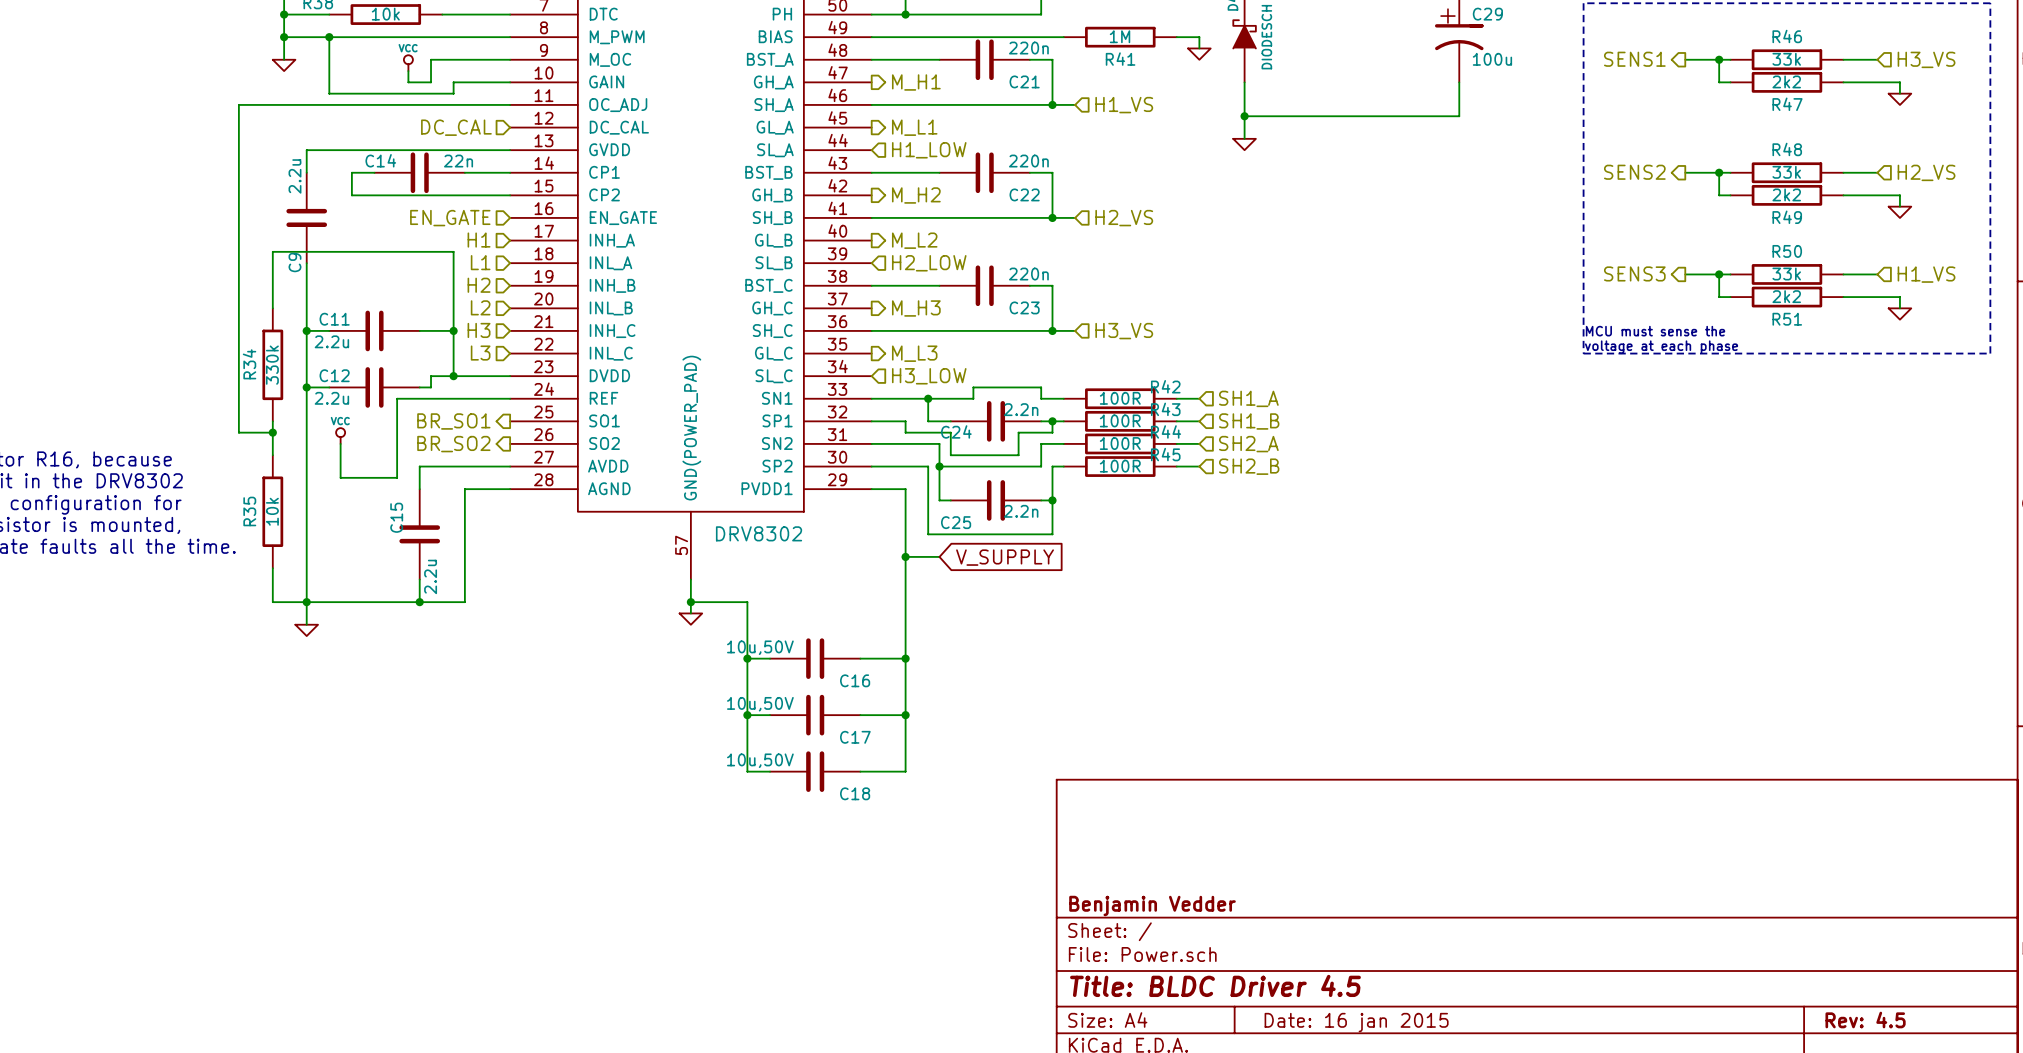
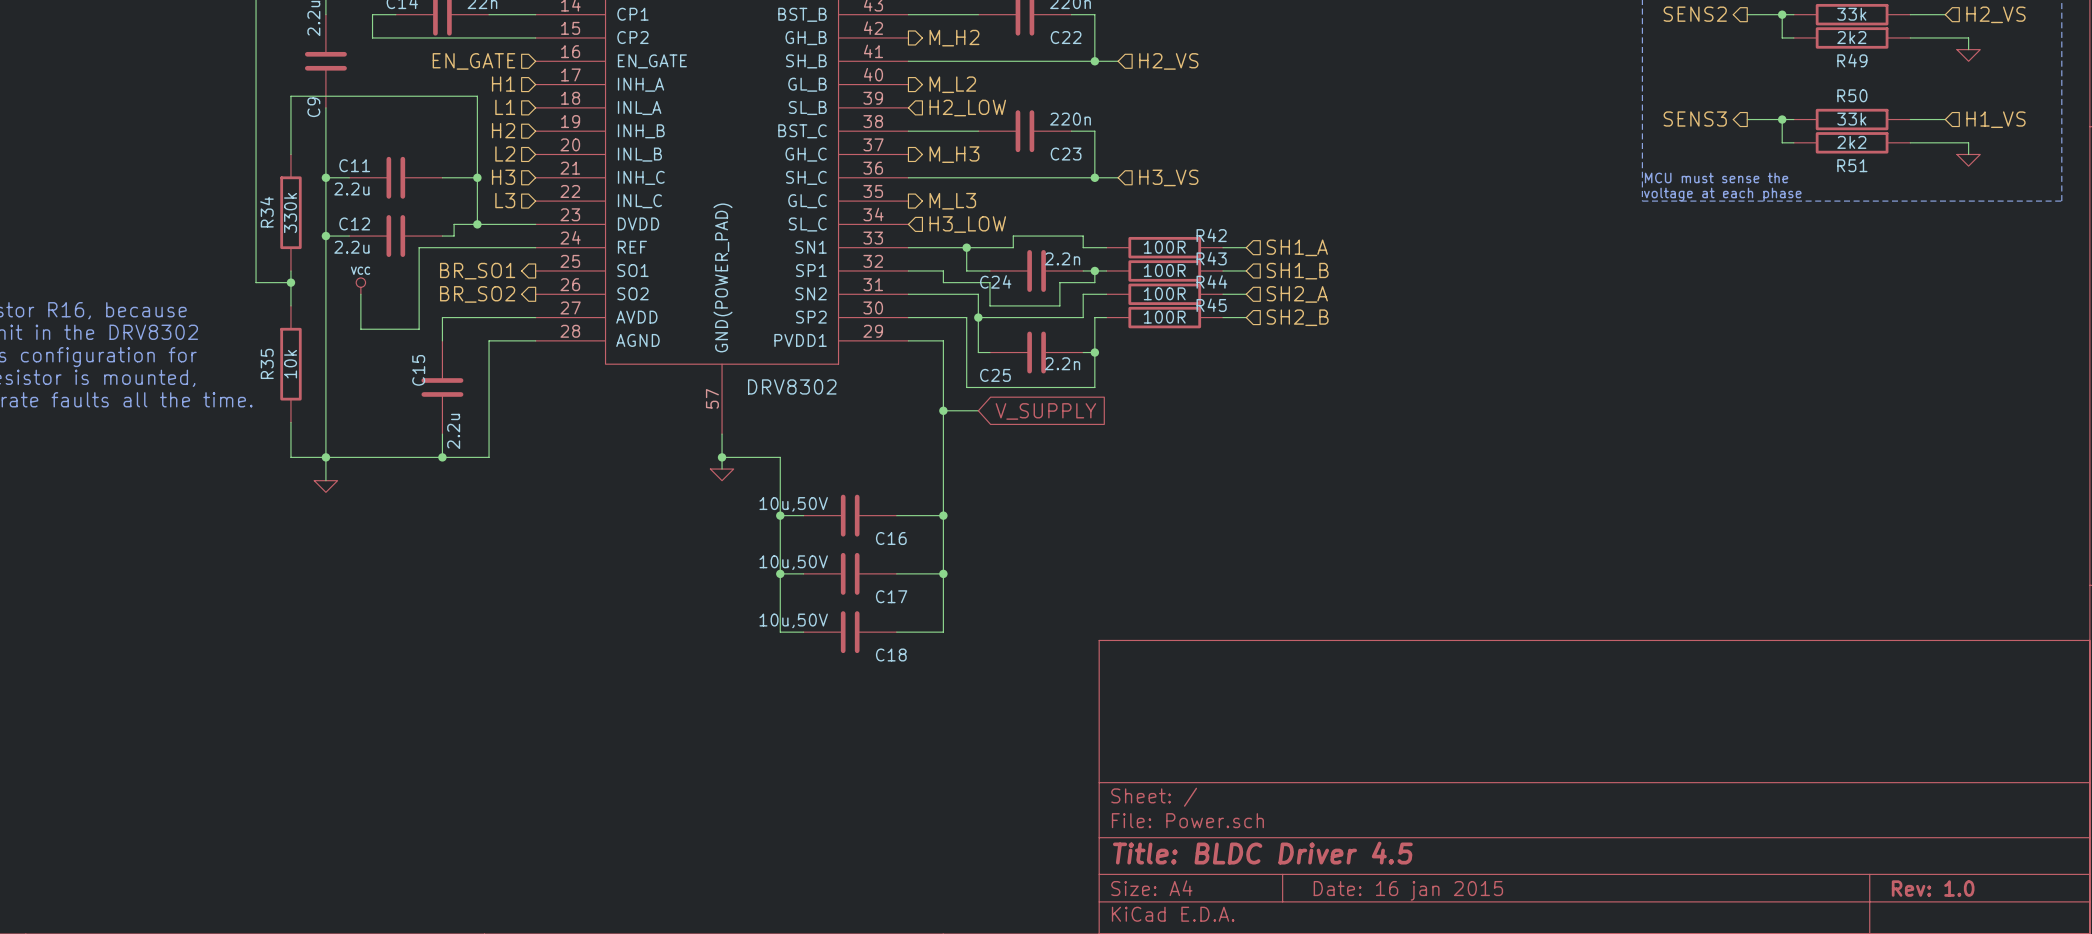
title block: Benjamin Vedder (1152, 906) -> none
title block: Rev: 4.5 (1865, 1020) -> Rev: 1.0 (1933, 888)

